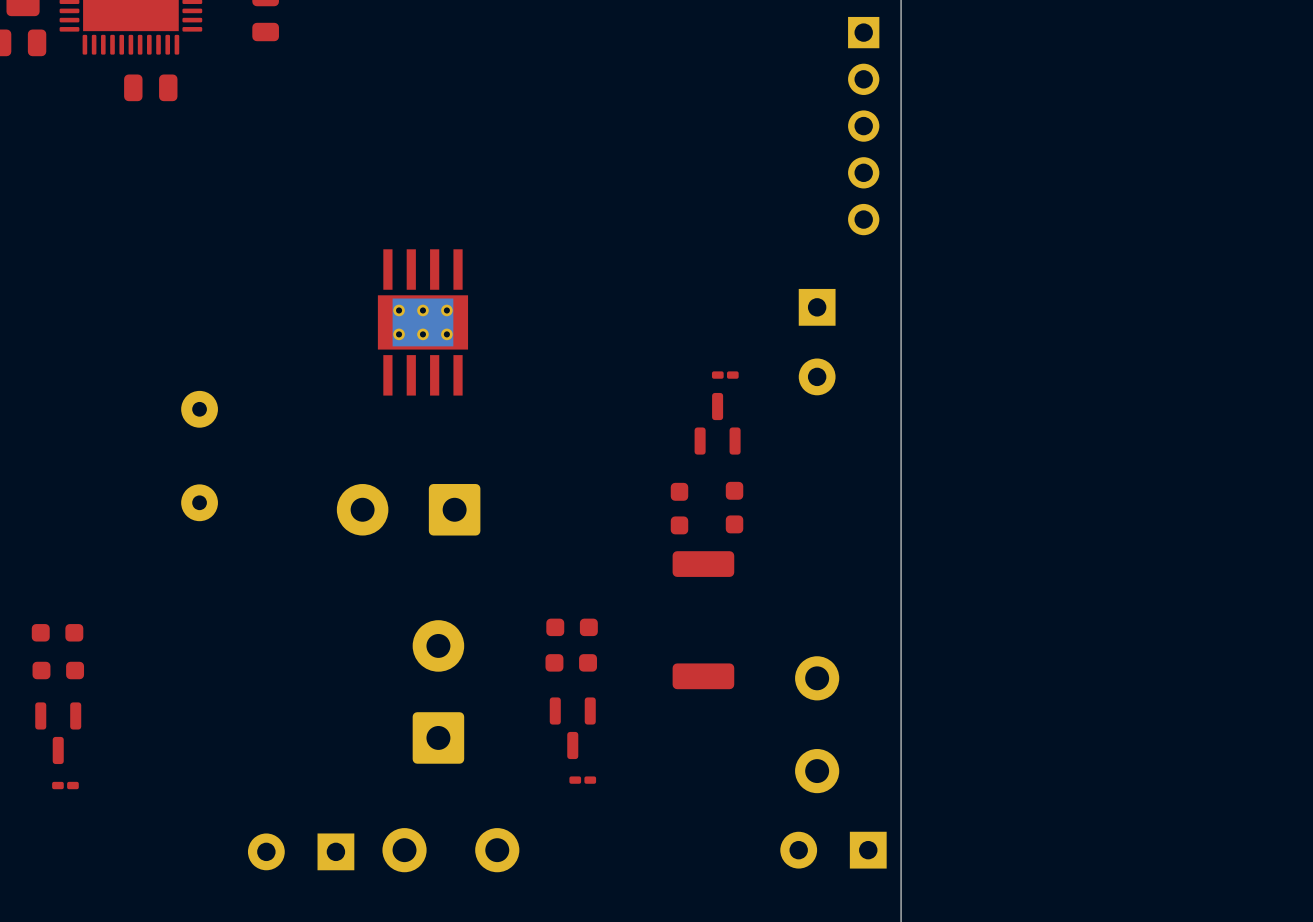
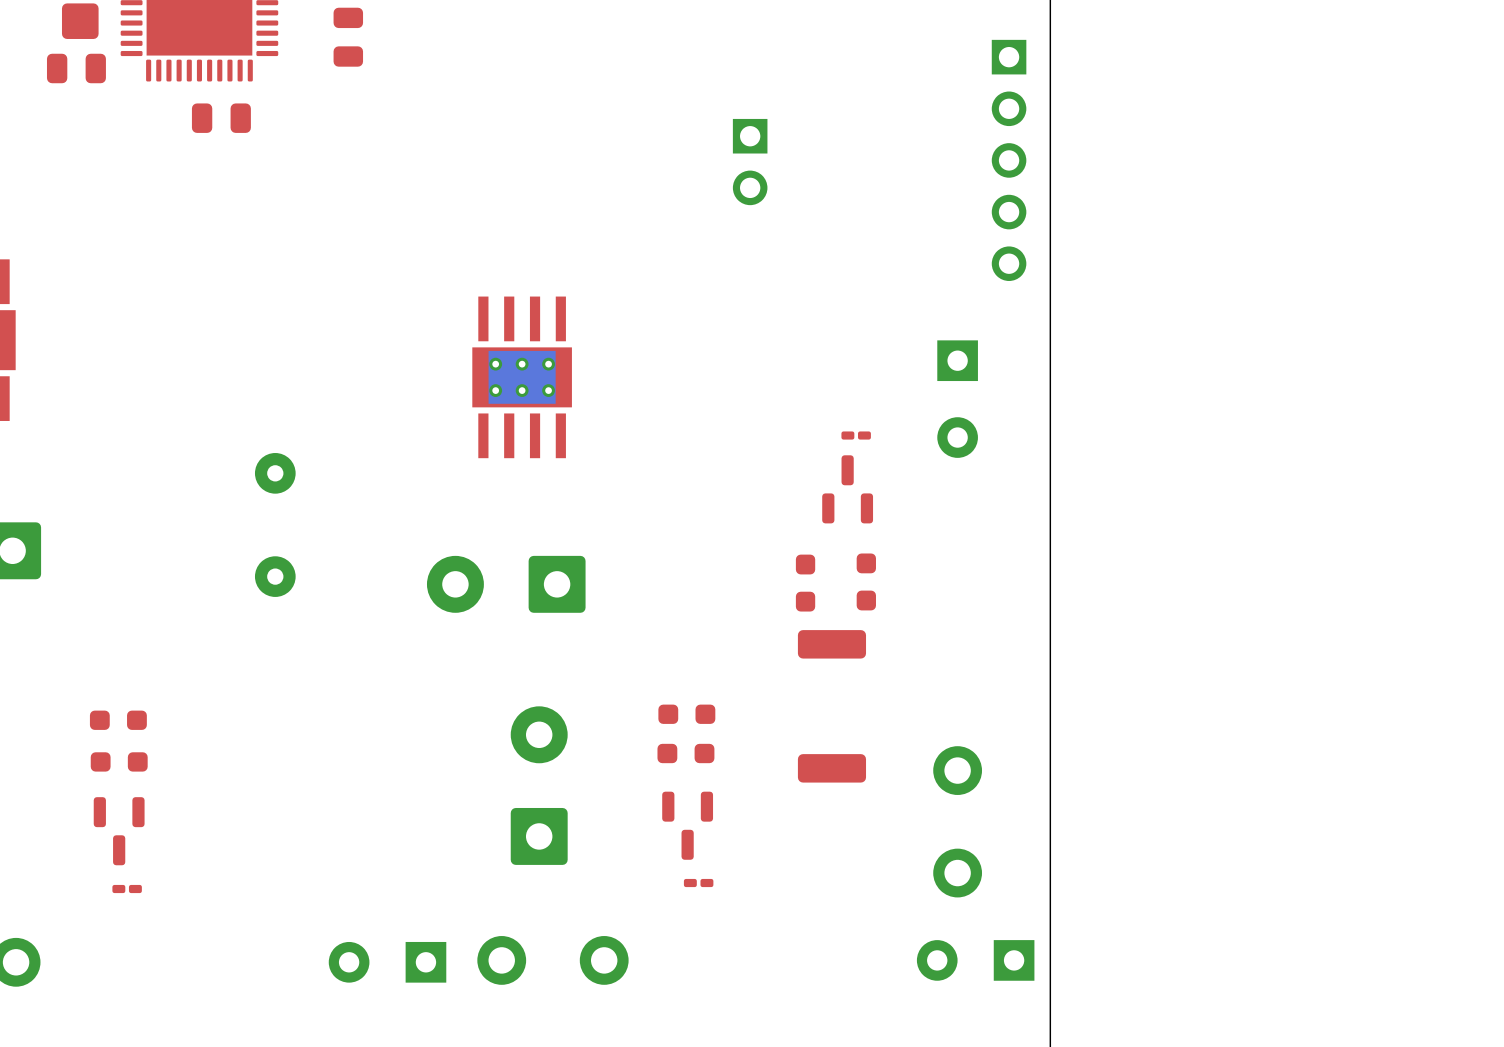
part: none -> (750, 162)

